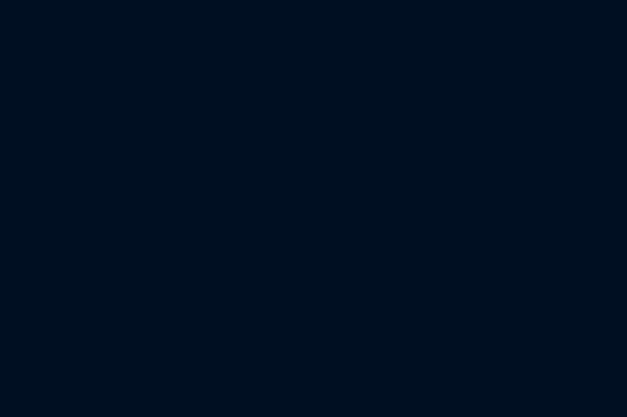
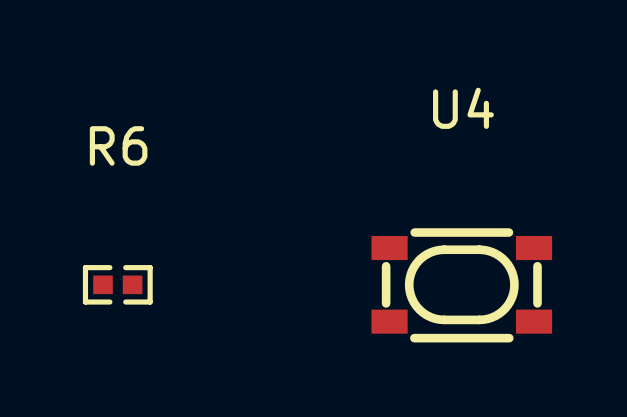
R6: none -> (117, 284)
U4: none -> (461, 285)

